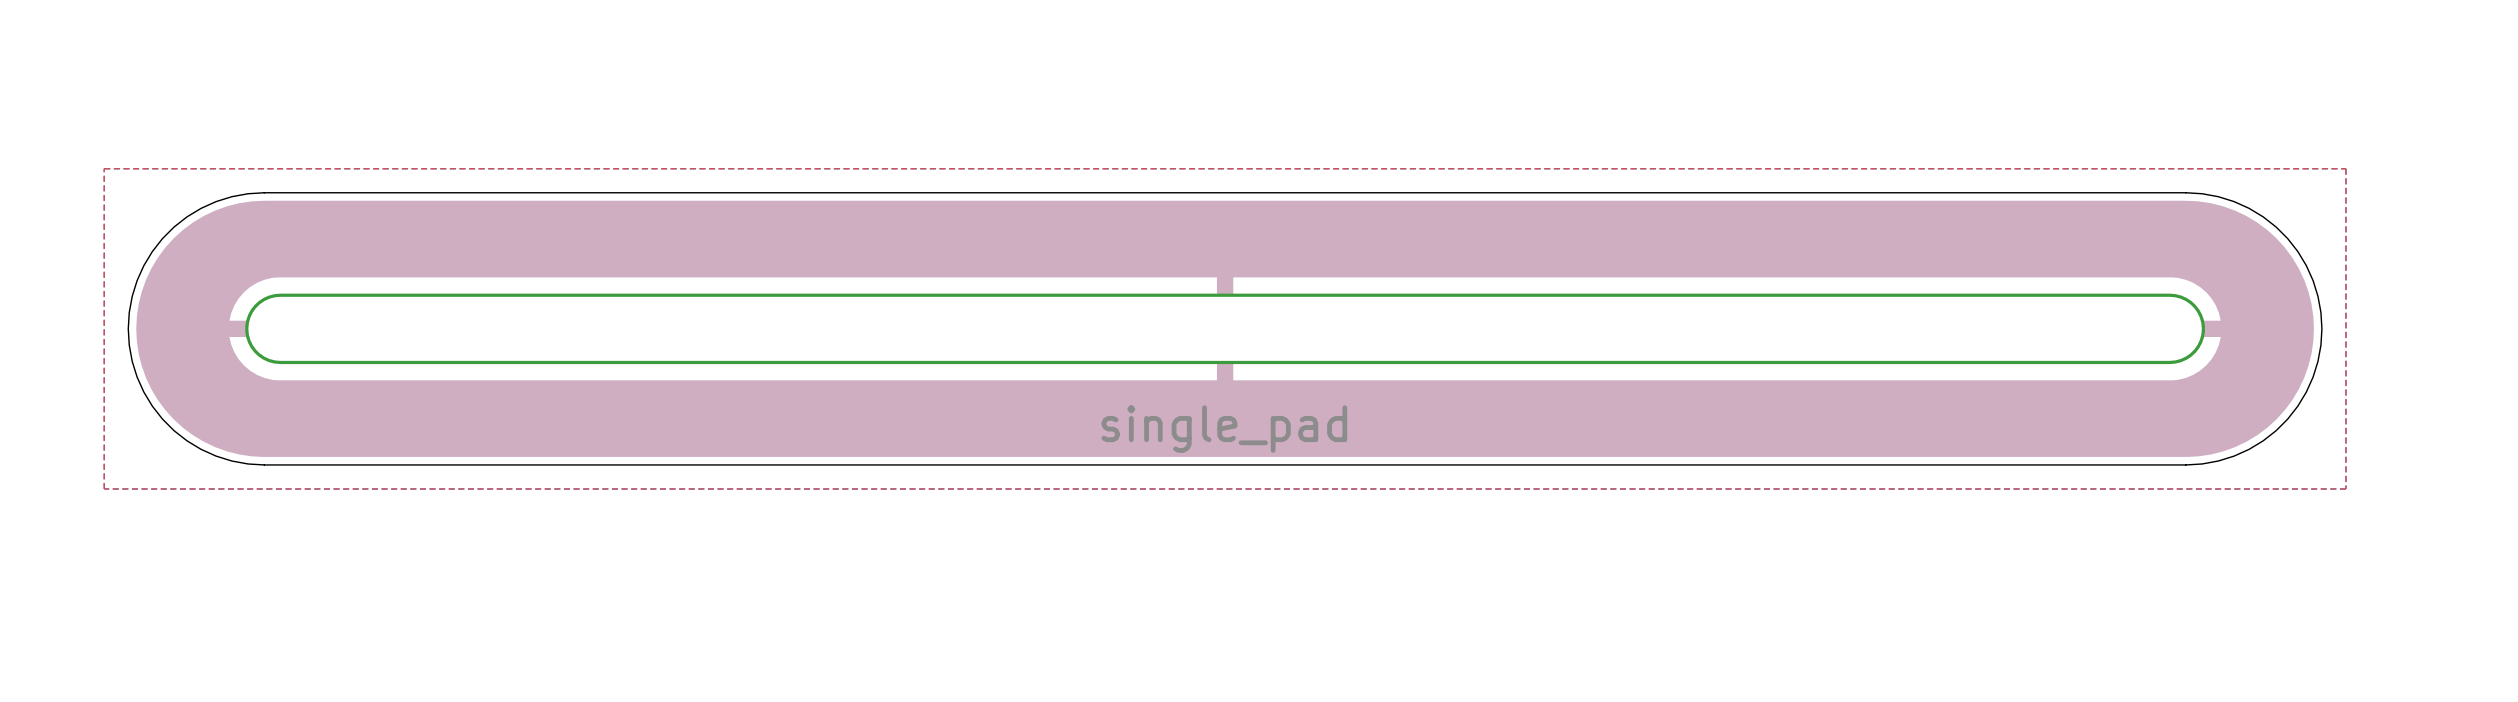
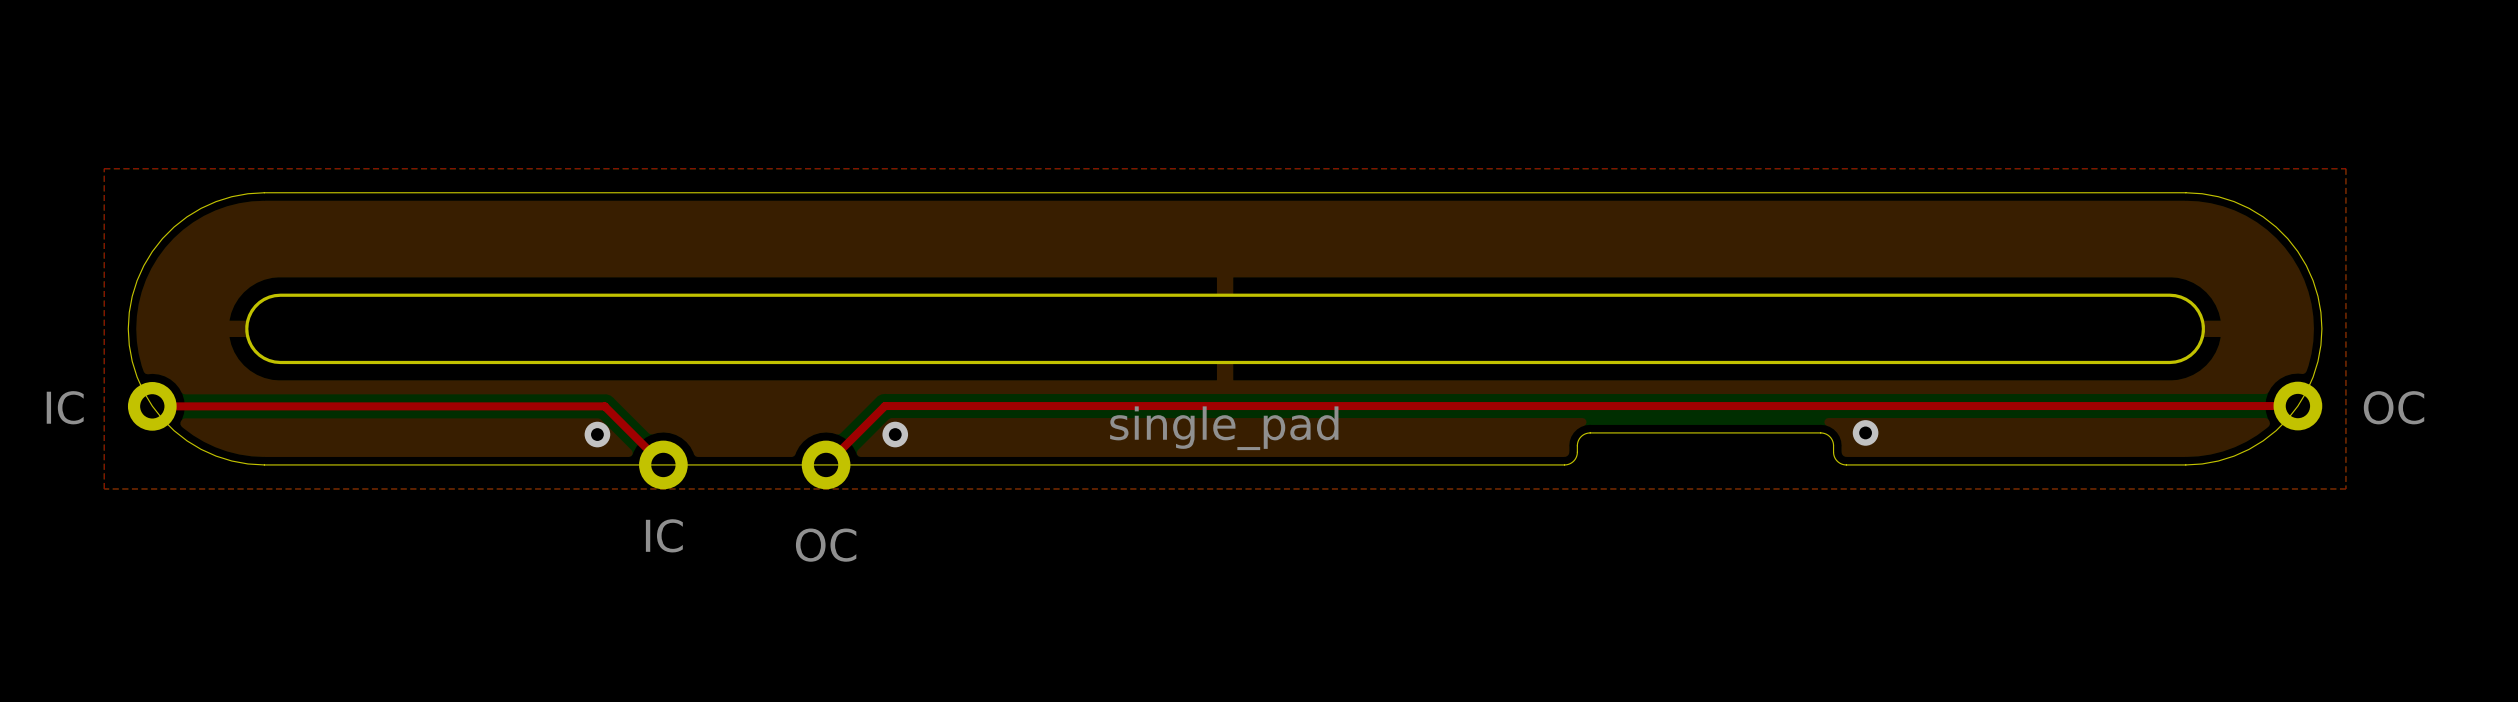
top track: none -> (152, 406) (604, 406) (663, 464)
part: none -> IC (152, 406)
top track: none -> (2297, 406) (885, 406) (826, 464)
part: none -> OC (2297, 406)
via: none -> (1865, 432)
via: none -> (597, 434)
via: none -> (895, 434)
part: none -> IC (663, 464)
part: none -> OC (826, 464)
board edge: (1564, 464) (1846, 464) -> (1564, 464) (1574, 460) (1579, 438) (1583, 434) (1590, 432) (1822, 433) (1827, 434) (1832, 440) (1836, 460) (1846, 464)

